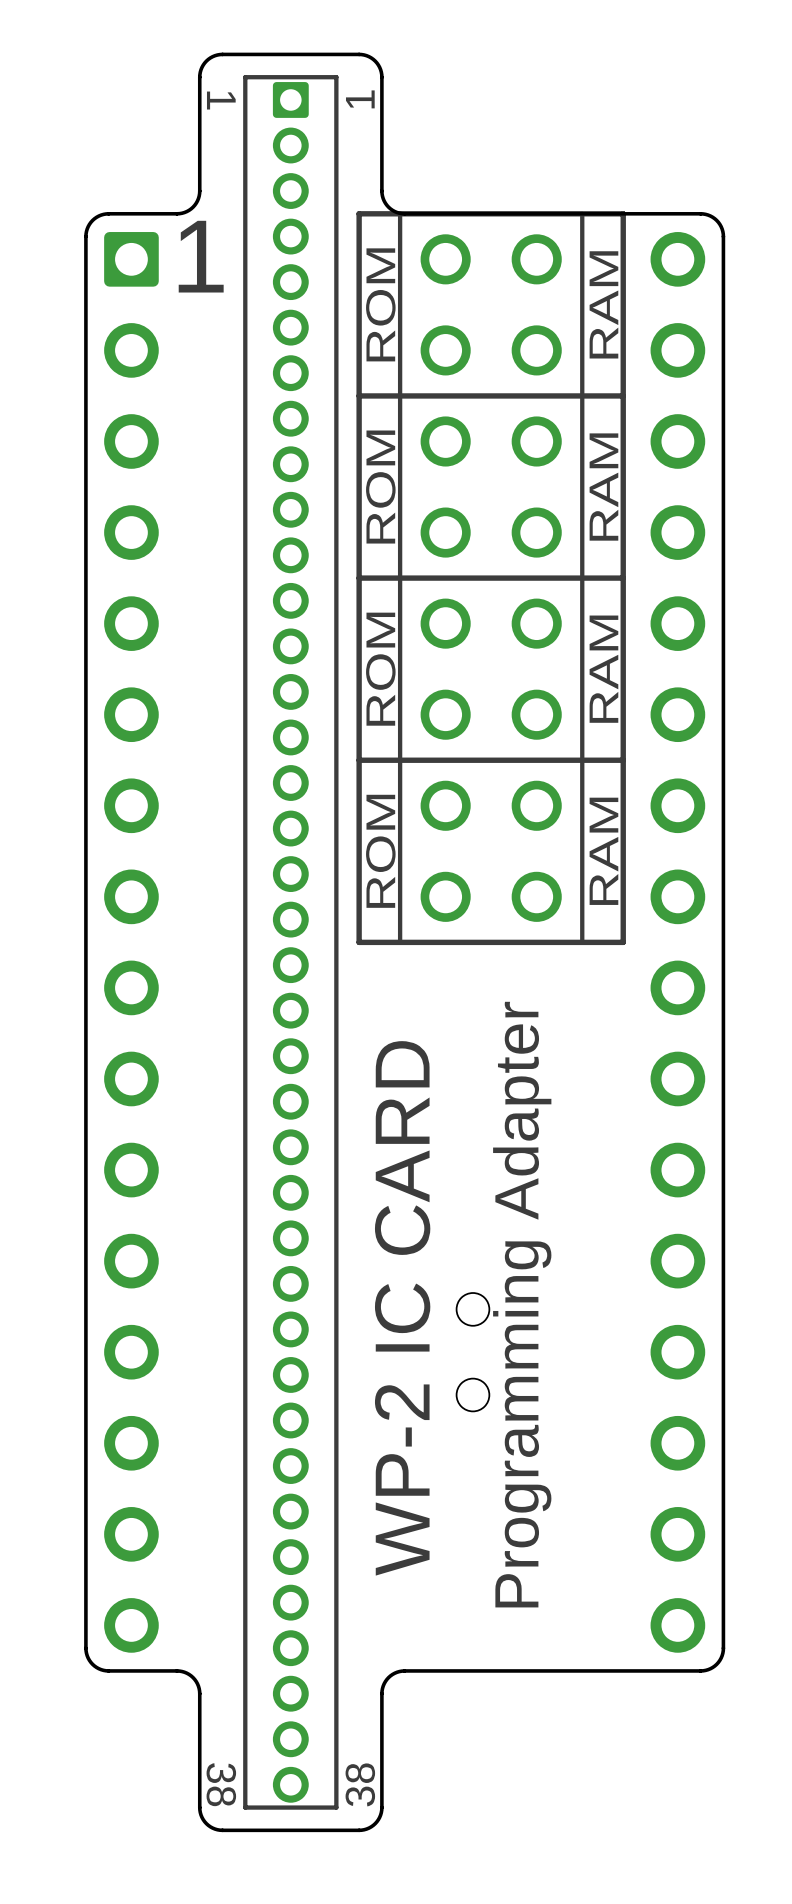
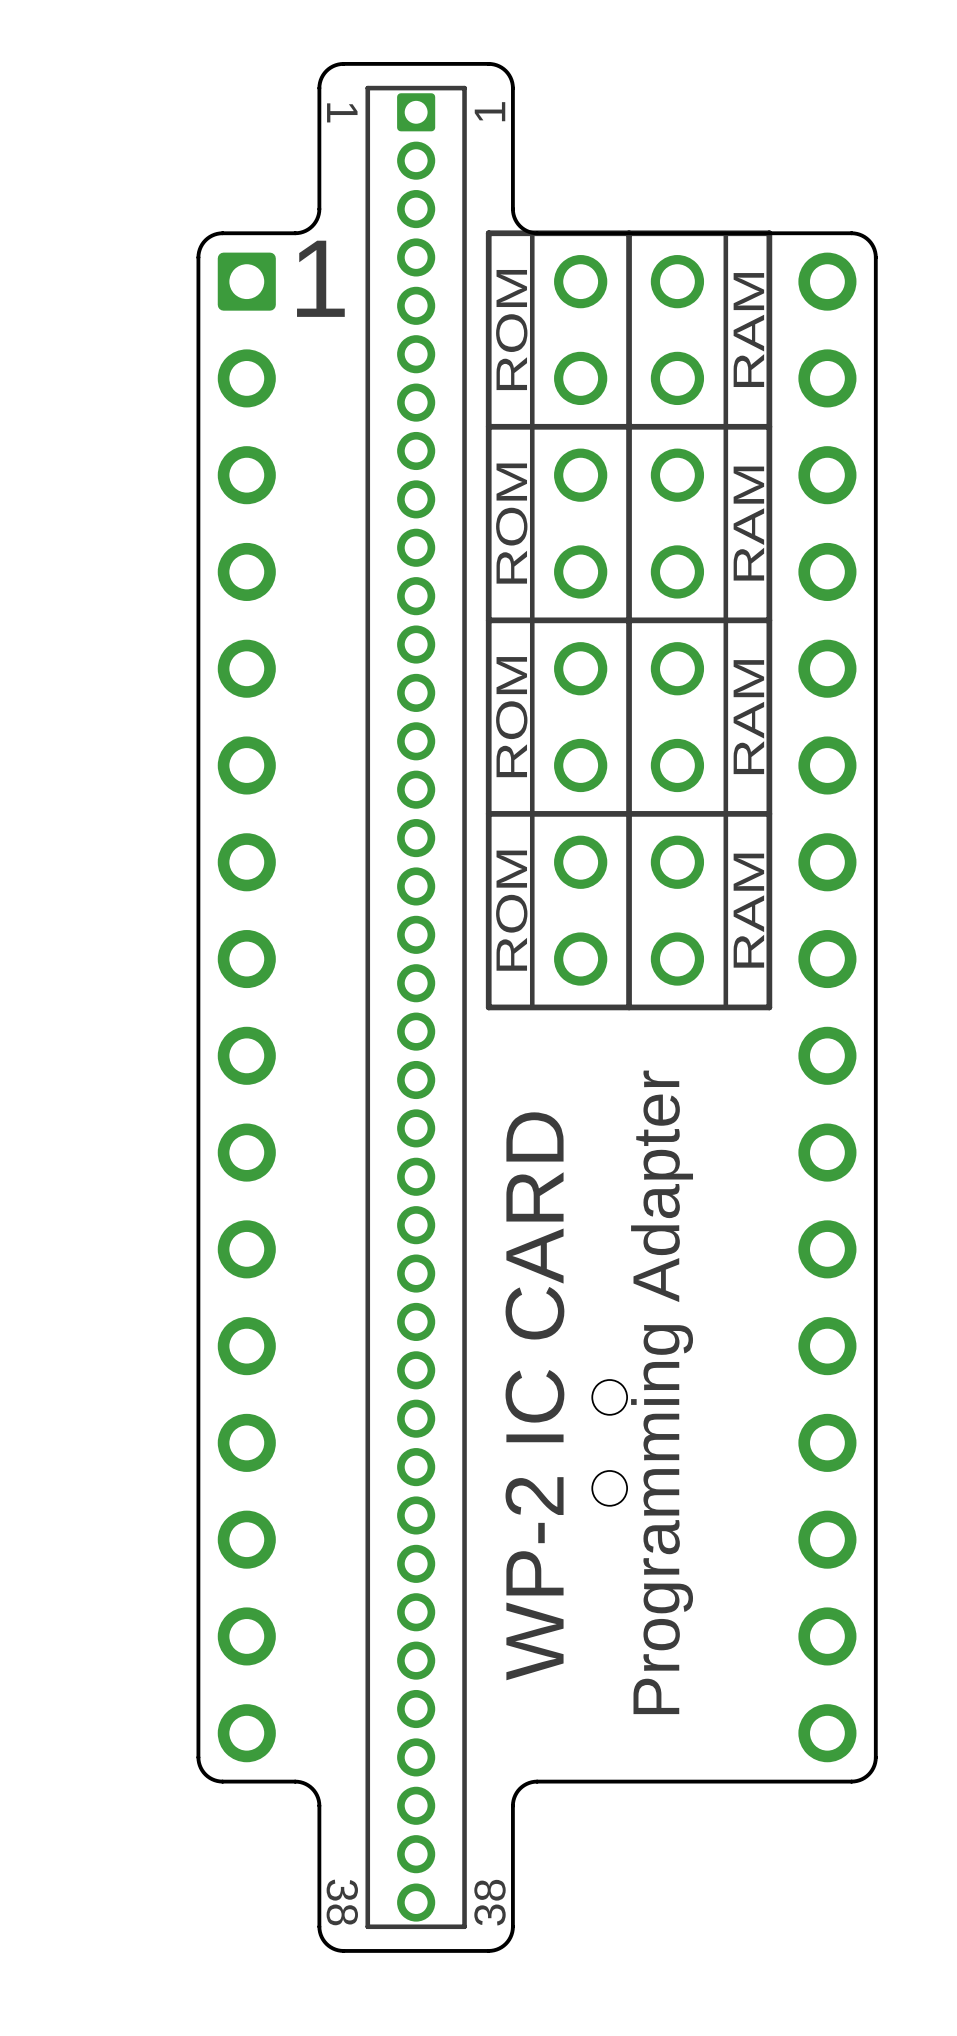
line: none -> (629, 233) (629, 1007)

